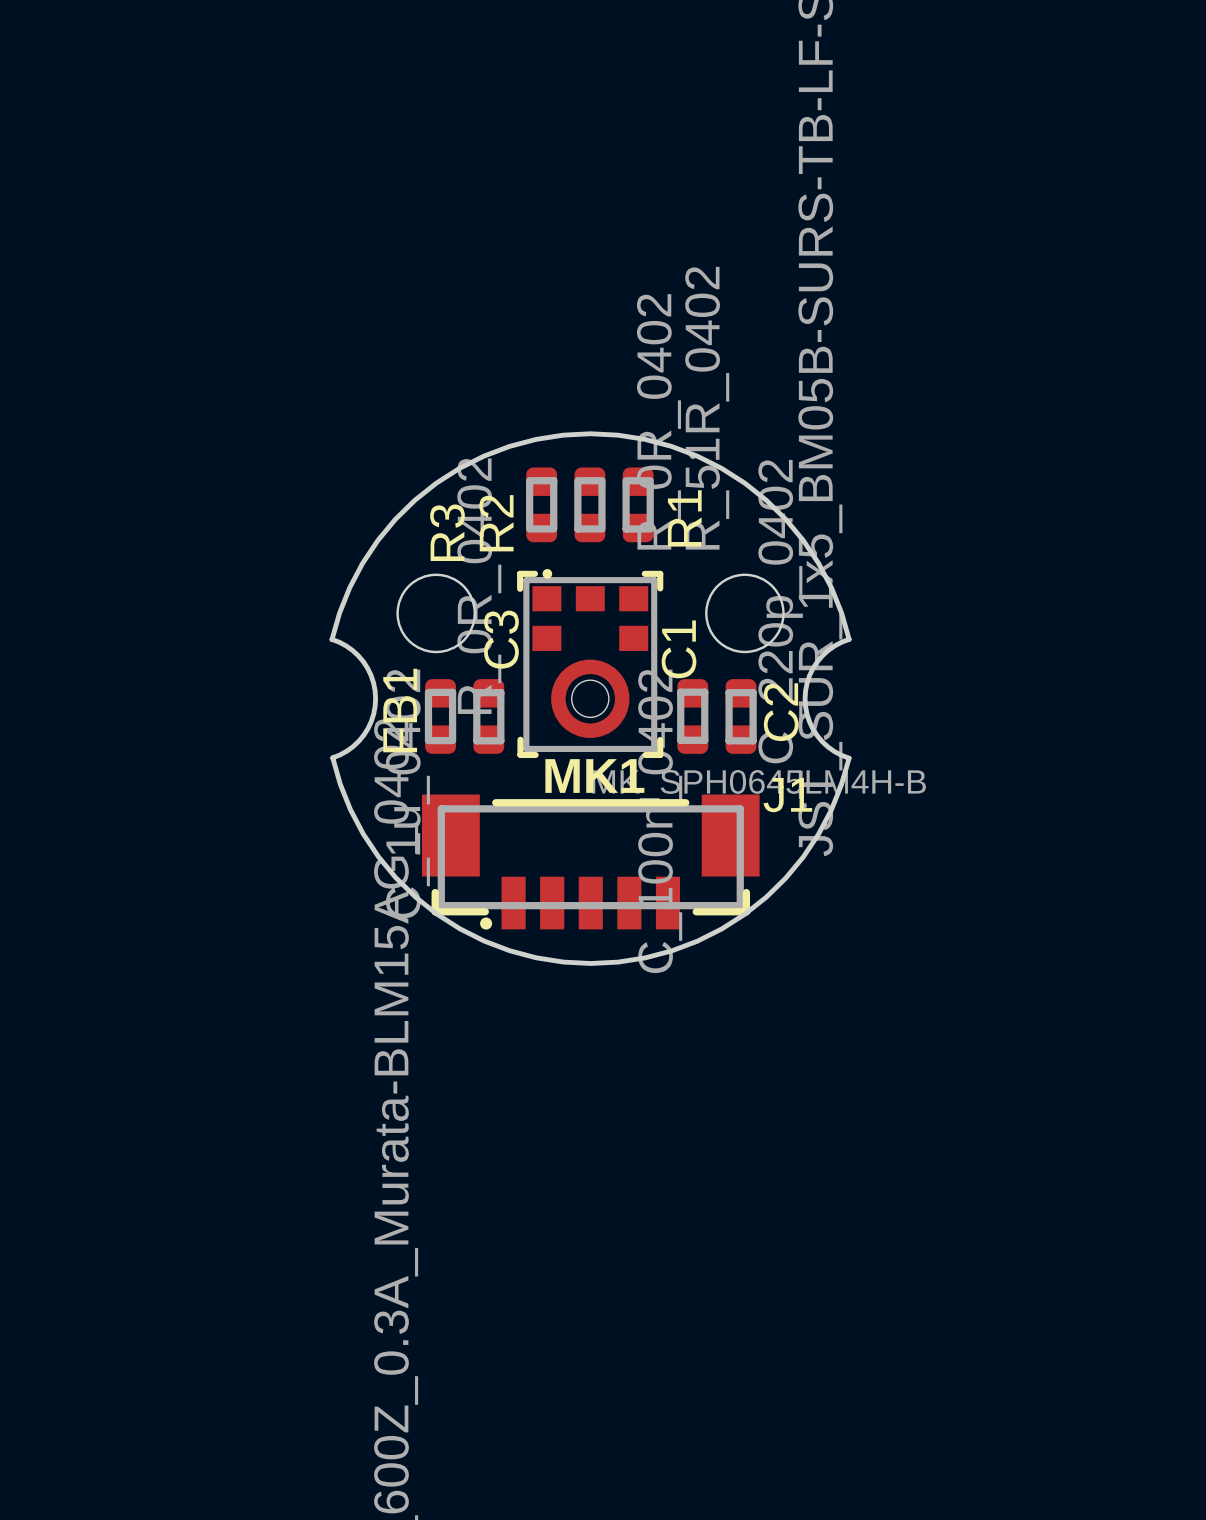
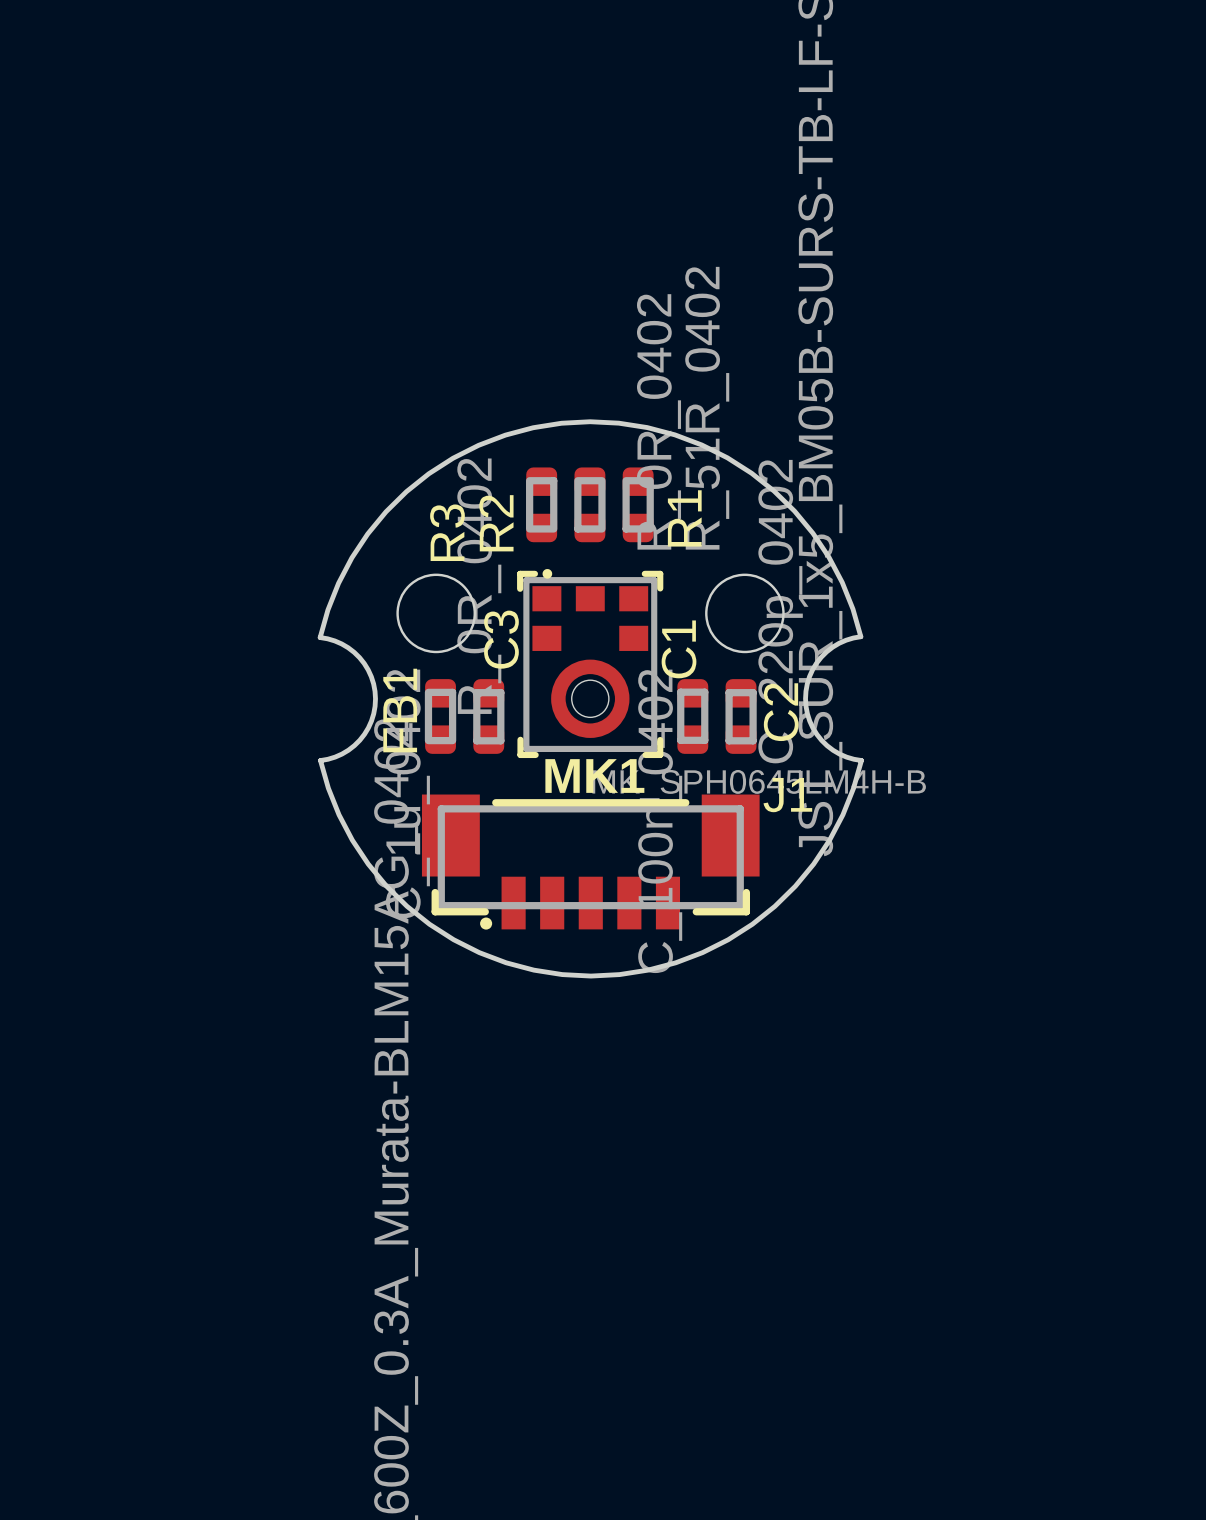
board edge: (332, 639) (346, 645) (363, 661) (371, 675) (375, 690) (373, 713) (363, 735) (346, 751) (332, 757) (340, 784) (363, 833) (395, 877) (436, 914) (484, 941) (536, 957) (590, 963) (645, 957) (697, 941) (744, 914) (766, 897) (803, 856) (831, 809) (849, 758) (828, 747) (817, 735) (809, 721) (805, 706) (807, 683) (813, 668) (828, 650) (849, 639) (841, 613) (818, 563) (785, 519) (744, 483) (697, 456) (645, 439) (590, 433) (563, 435) (509, 446) (459, 468) (414, 500) (377, 540) (349, 587) (339, 613) (332, 639) -> (860, 636) (842, 582) (812, 533) (774, 491) (727, 457) (674, 434) (647, 427) (590, 421) (533, 427) (478, 445) (428, 473) (386, 511) (351, 557) (338, 583) (320, 637) (334, 640) (348, 647) (364, 663) (373, 683) (375, 706) (368, 727) (354, 745) (335, 757) (320, 760) (339, 814) (368, 864) (407, 906) (453, 939) (506, 962) (562, 974) (590, 976) (648, 970) (702, 952) (752, 924) (795, 886) (829, 840) (853, 788) (861, 760) (839, 754) (827, 745) (816, 734) (807, 713) (805, 691) (809, 676) (821, 657) (839, 643) (860, 636)

